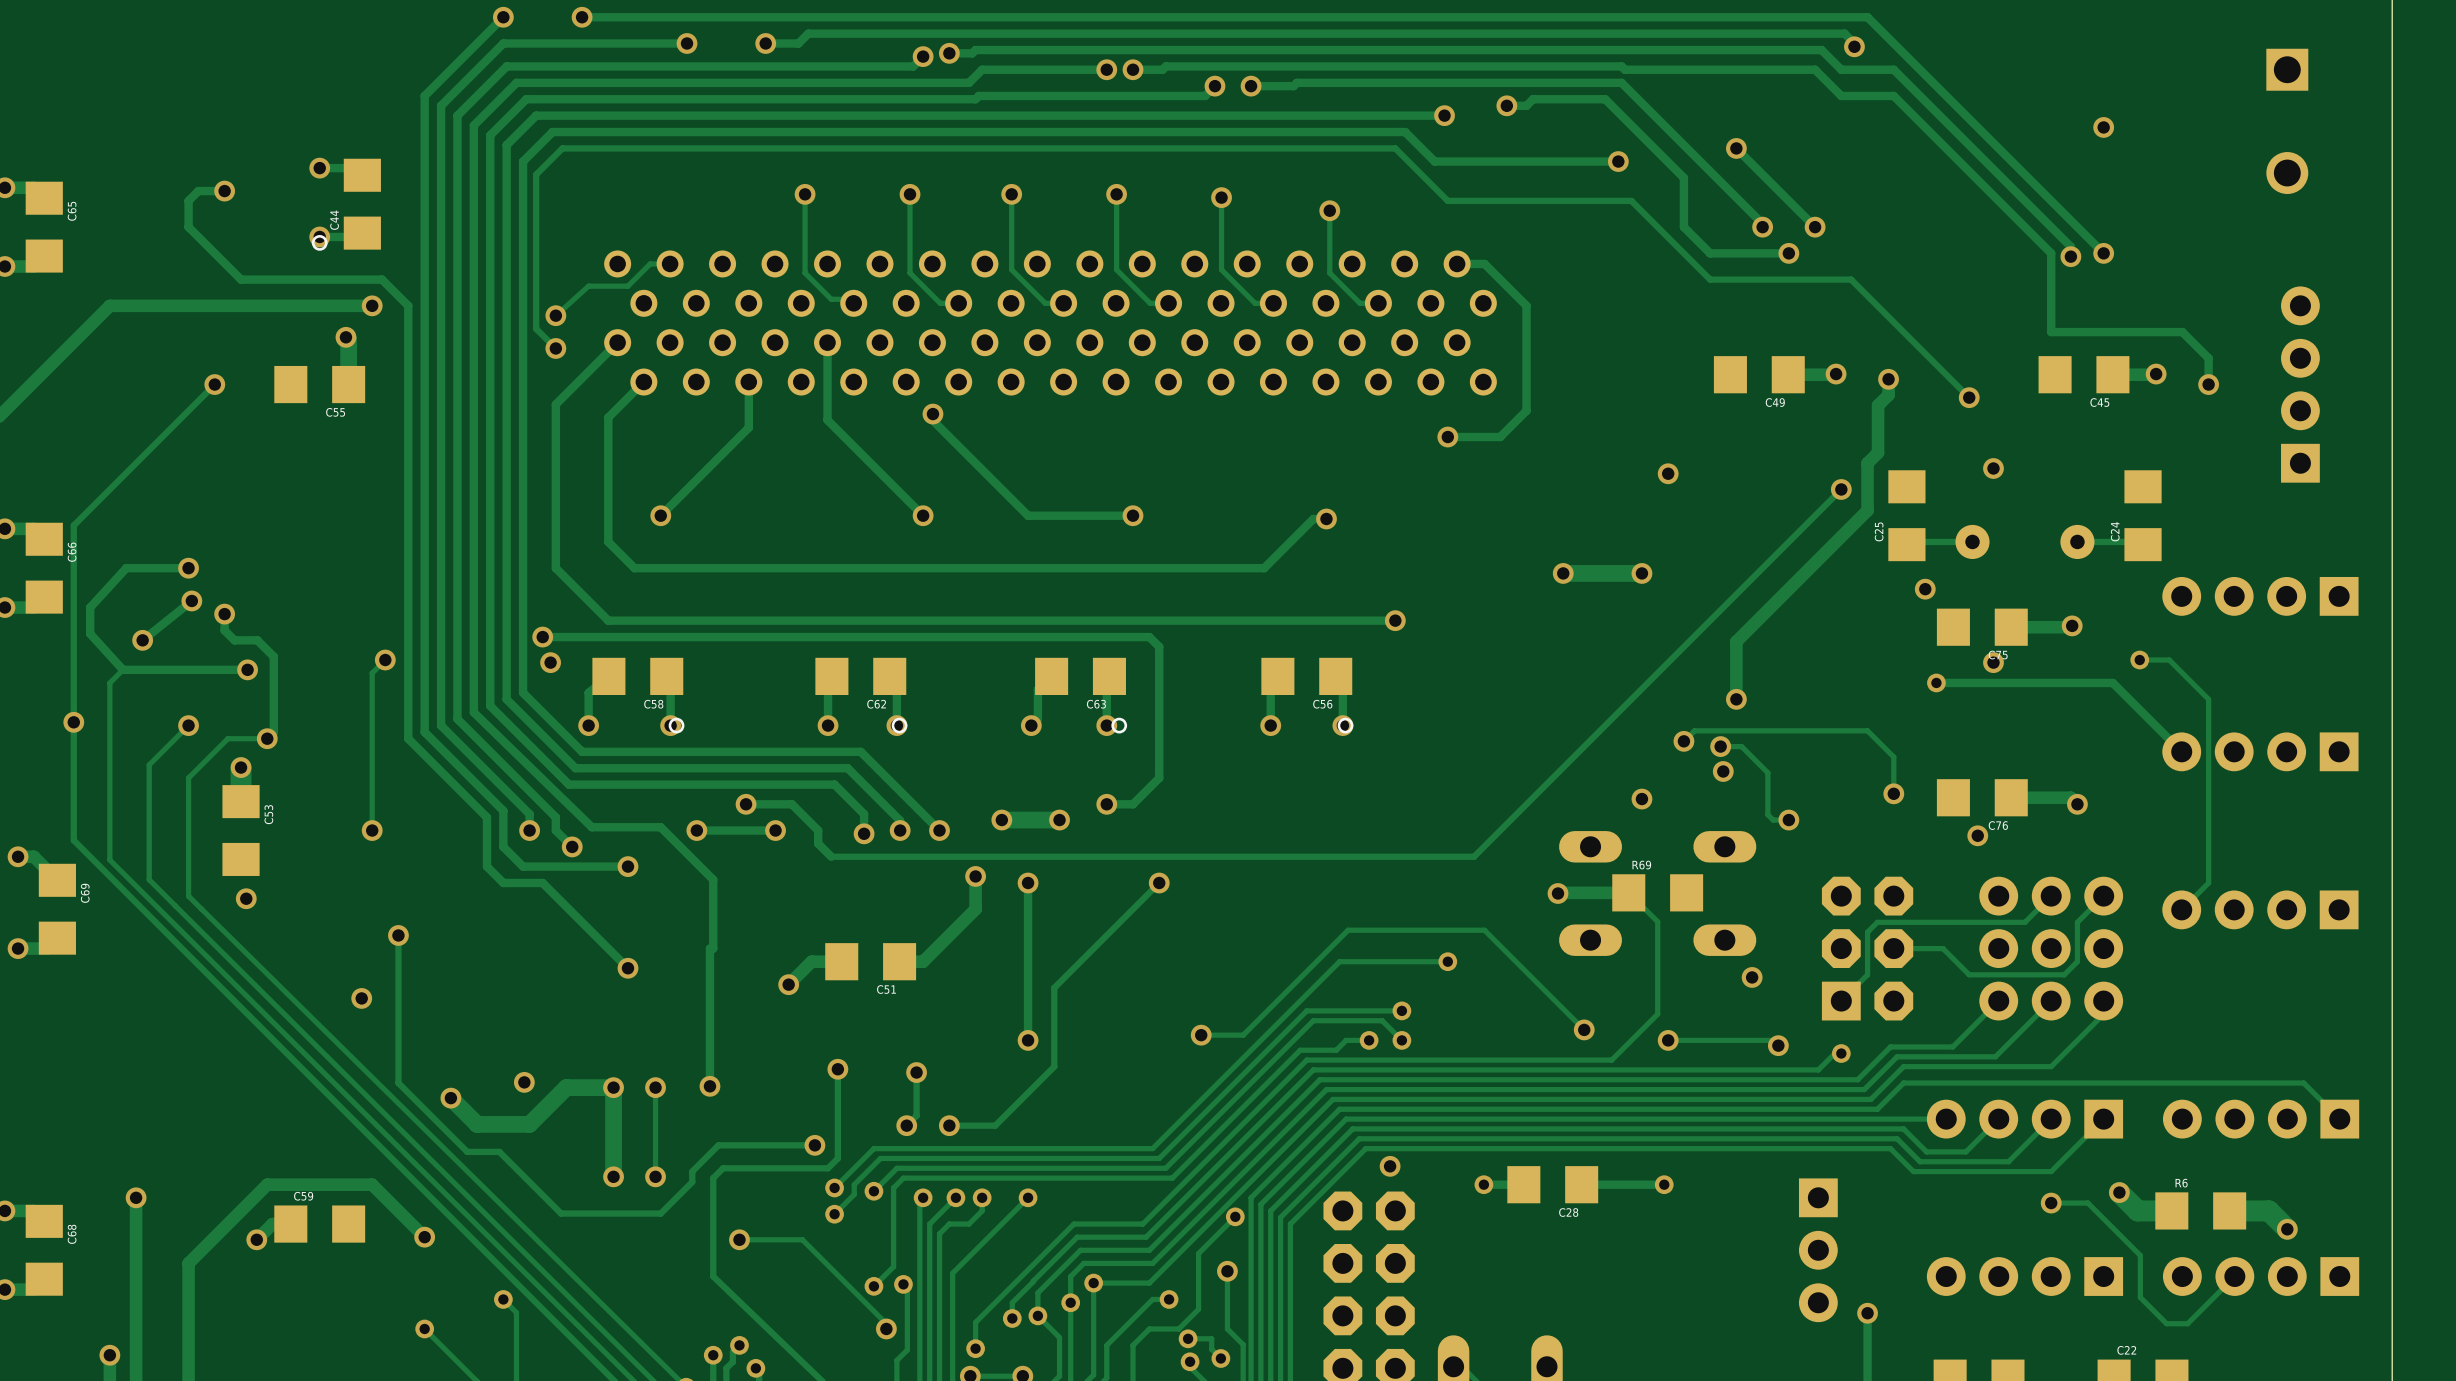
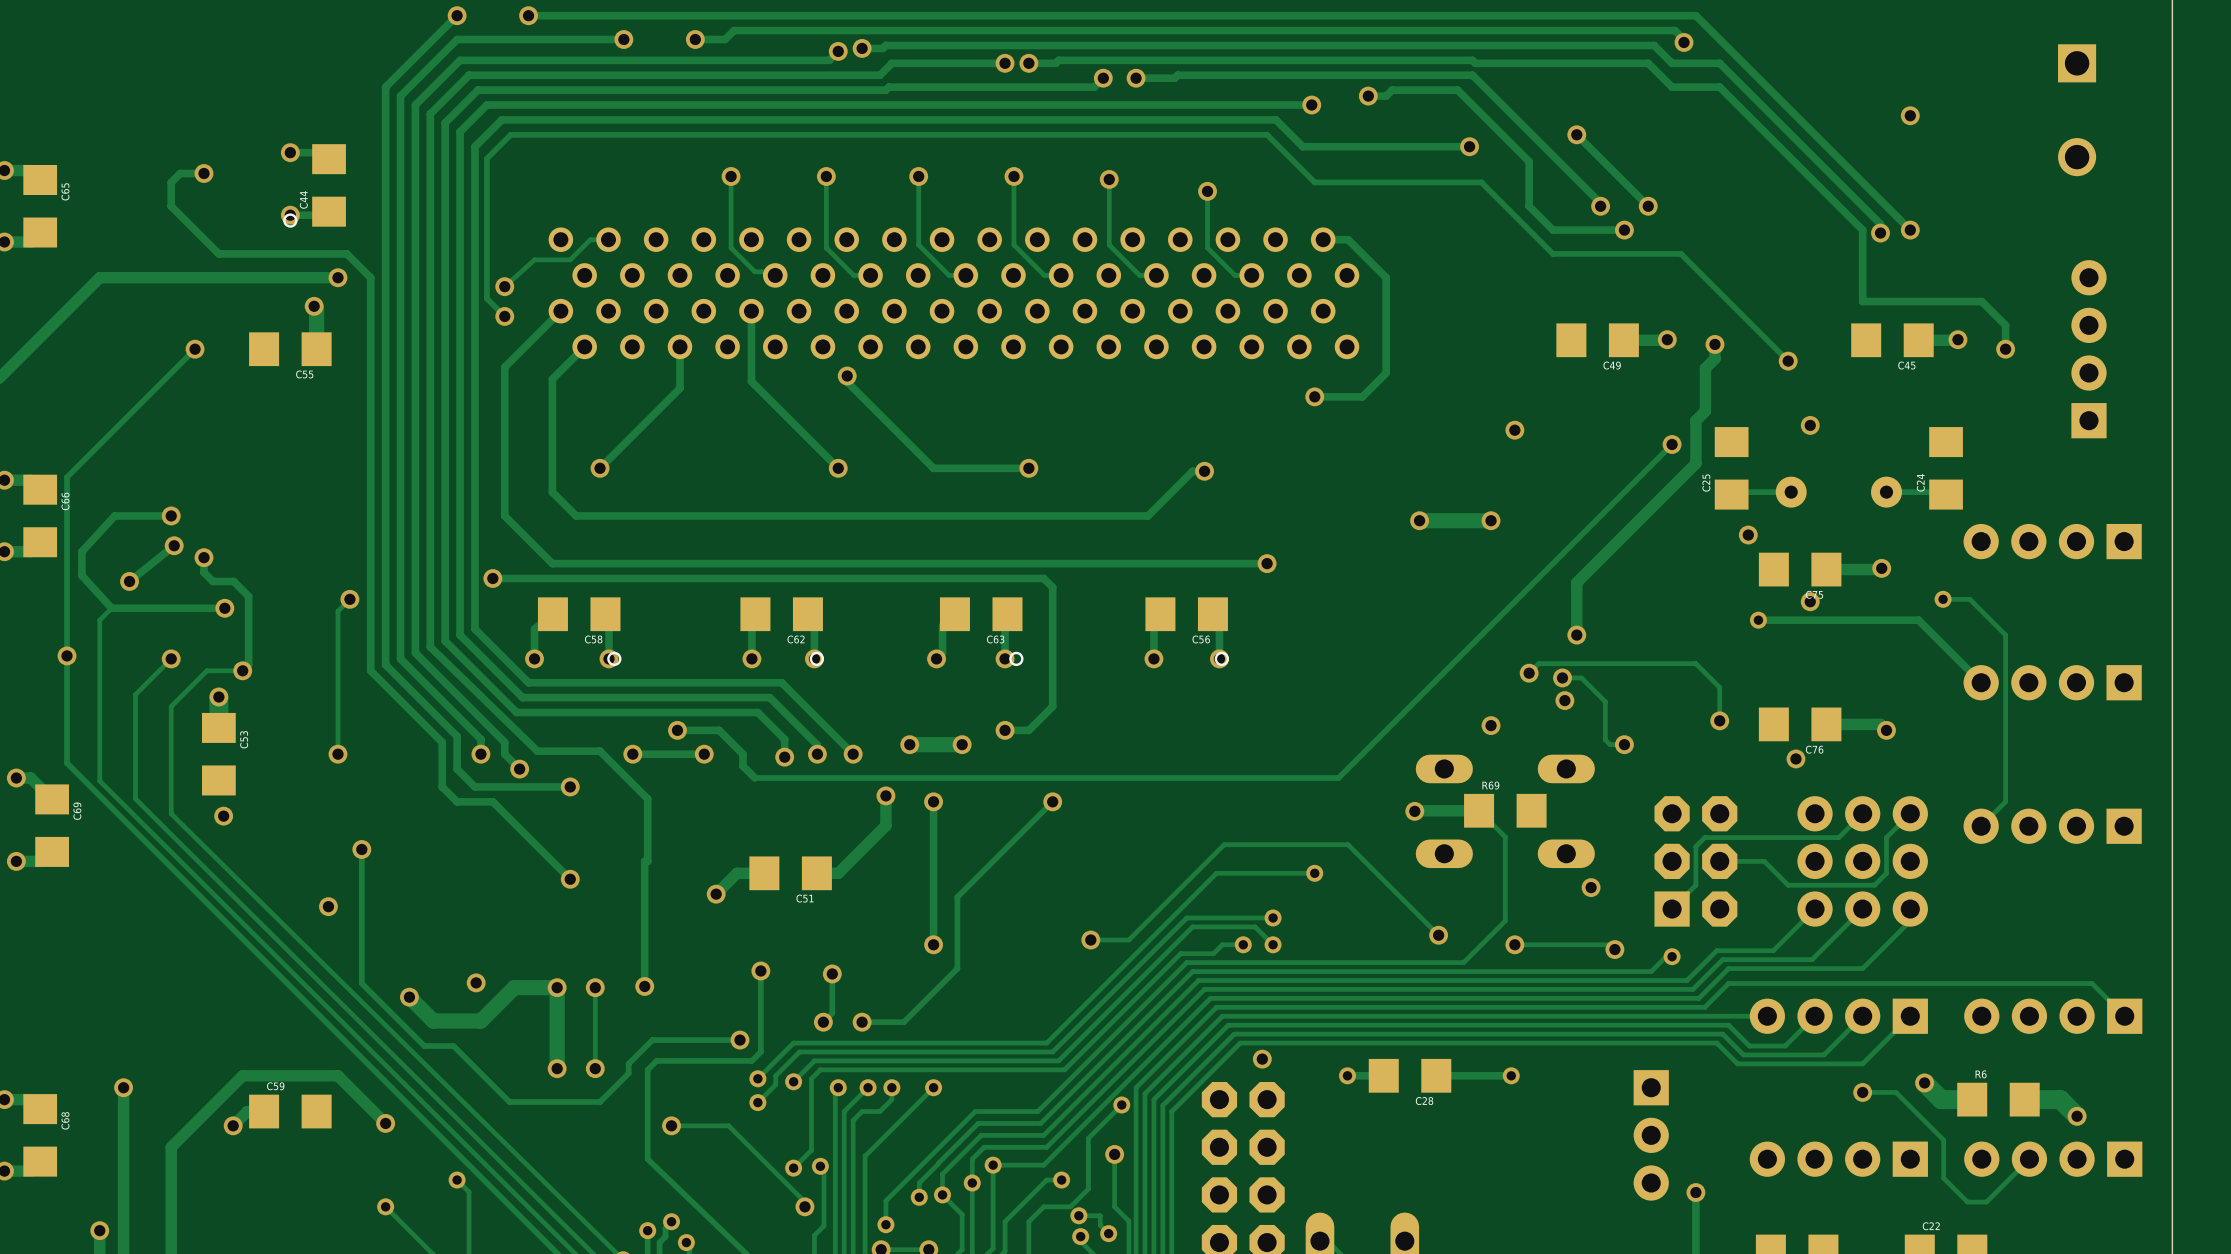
via: (550, 662) -> none

